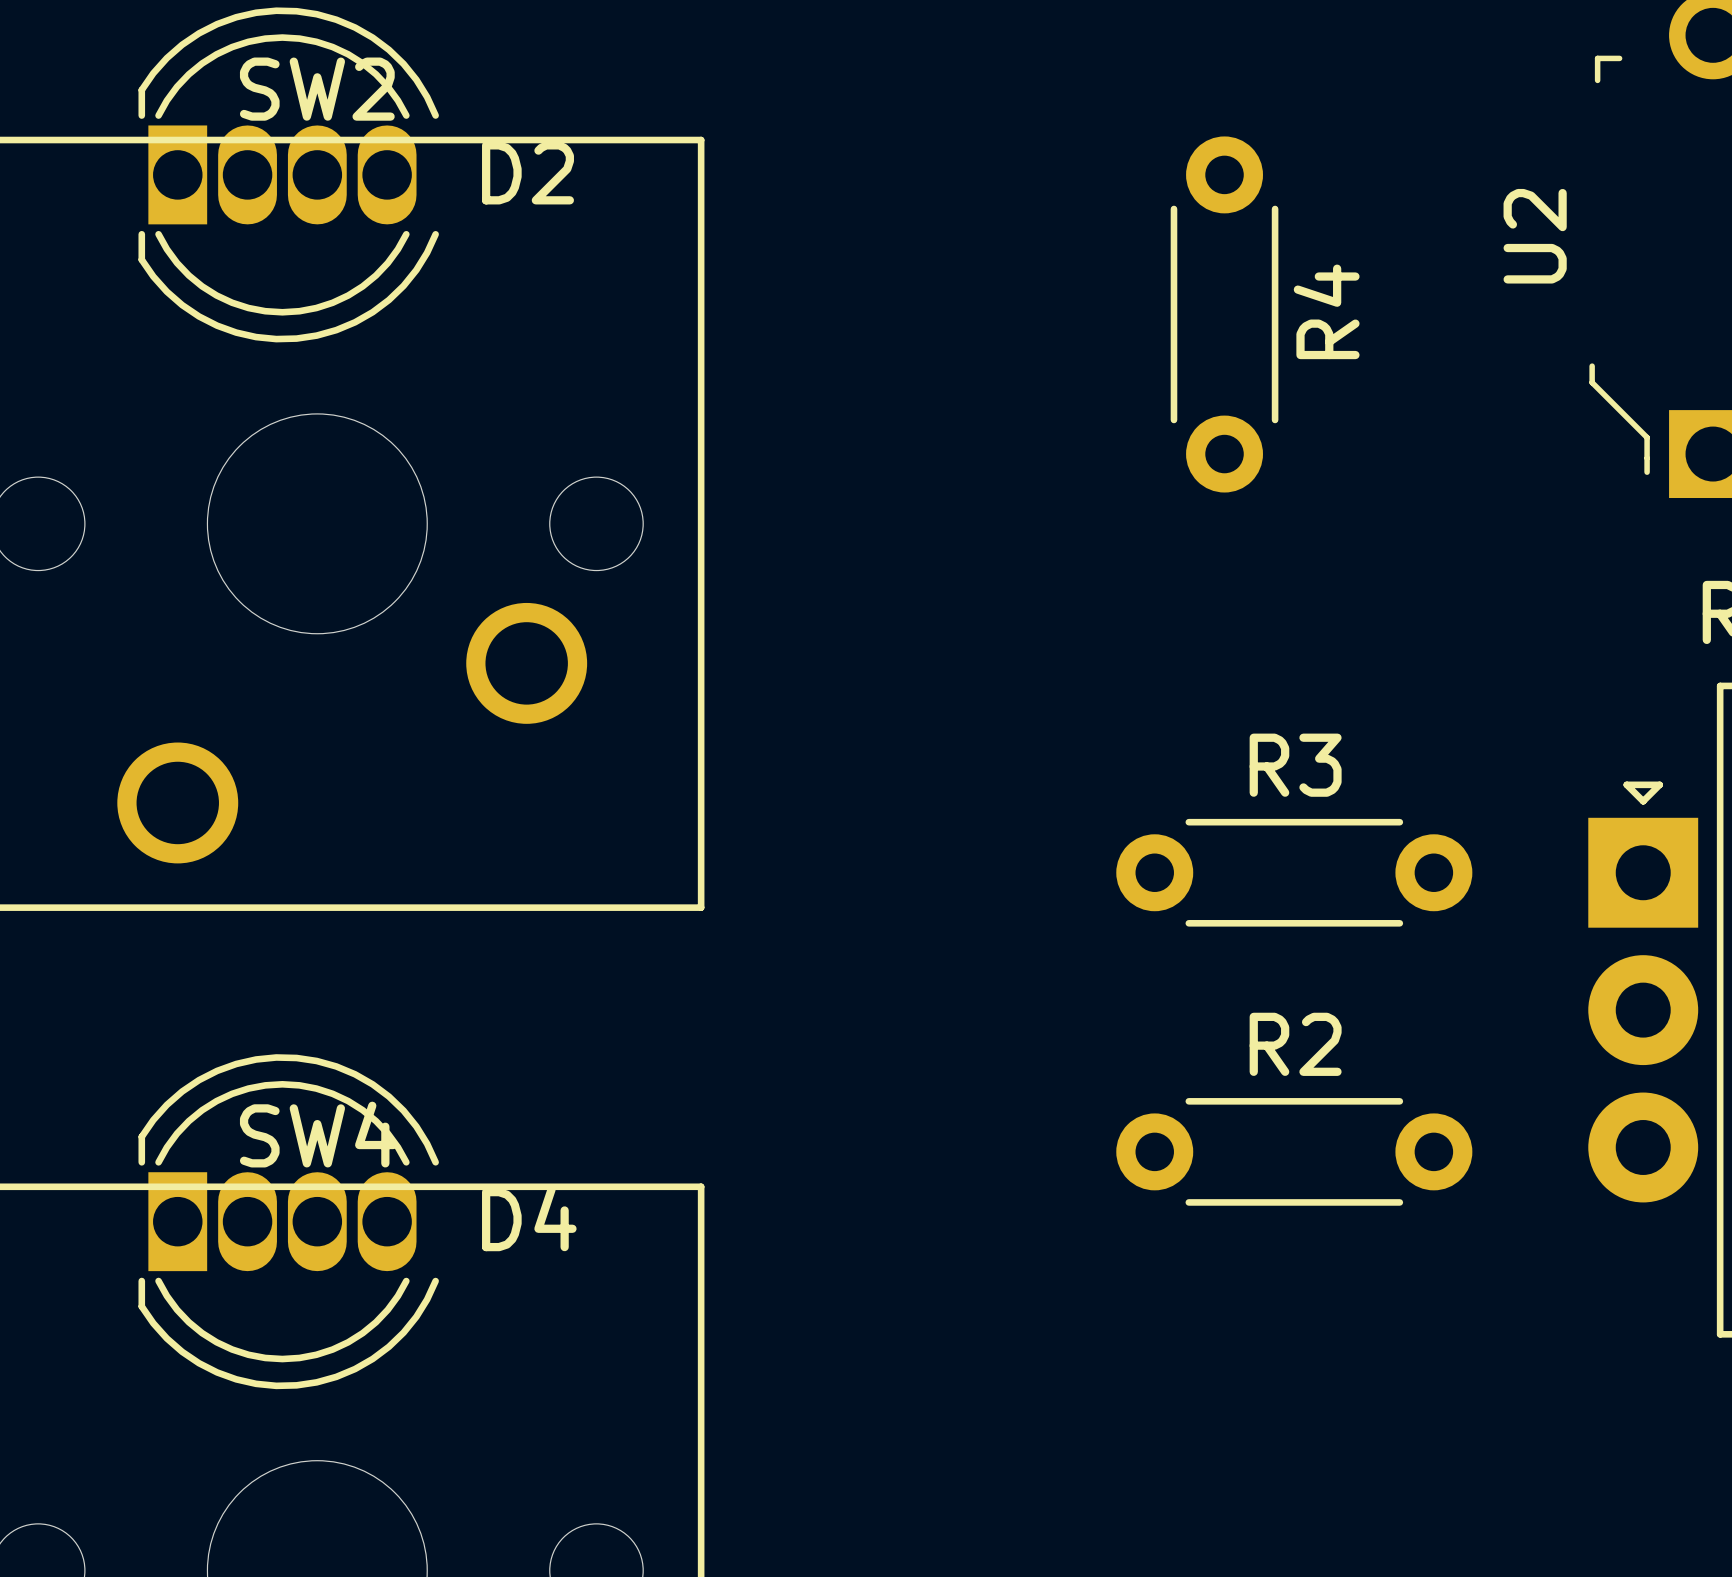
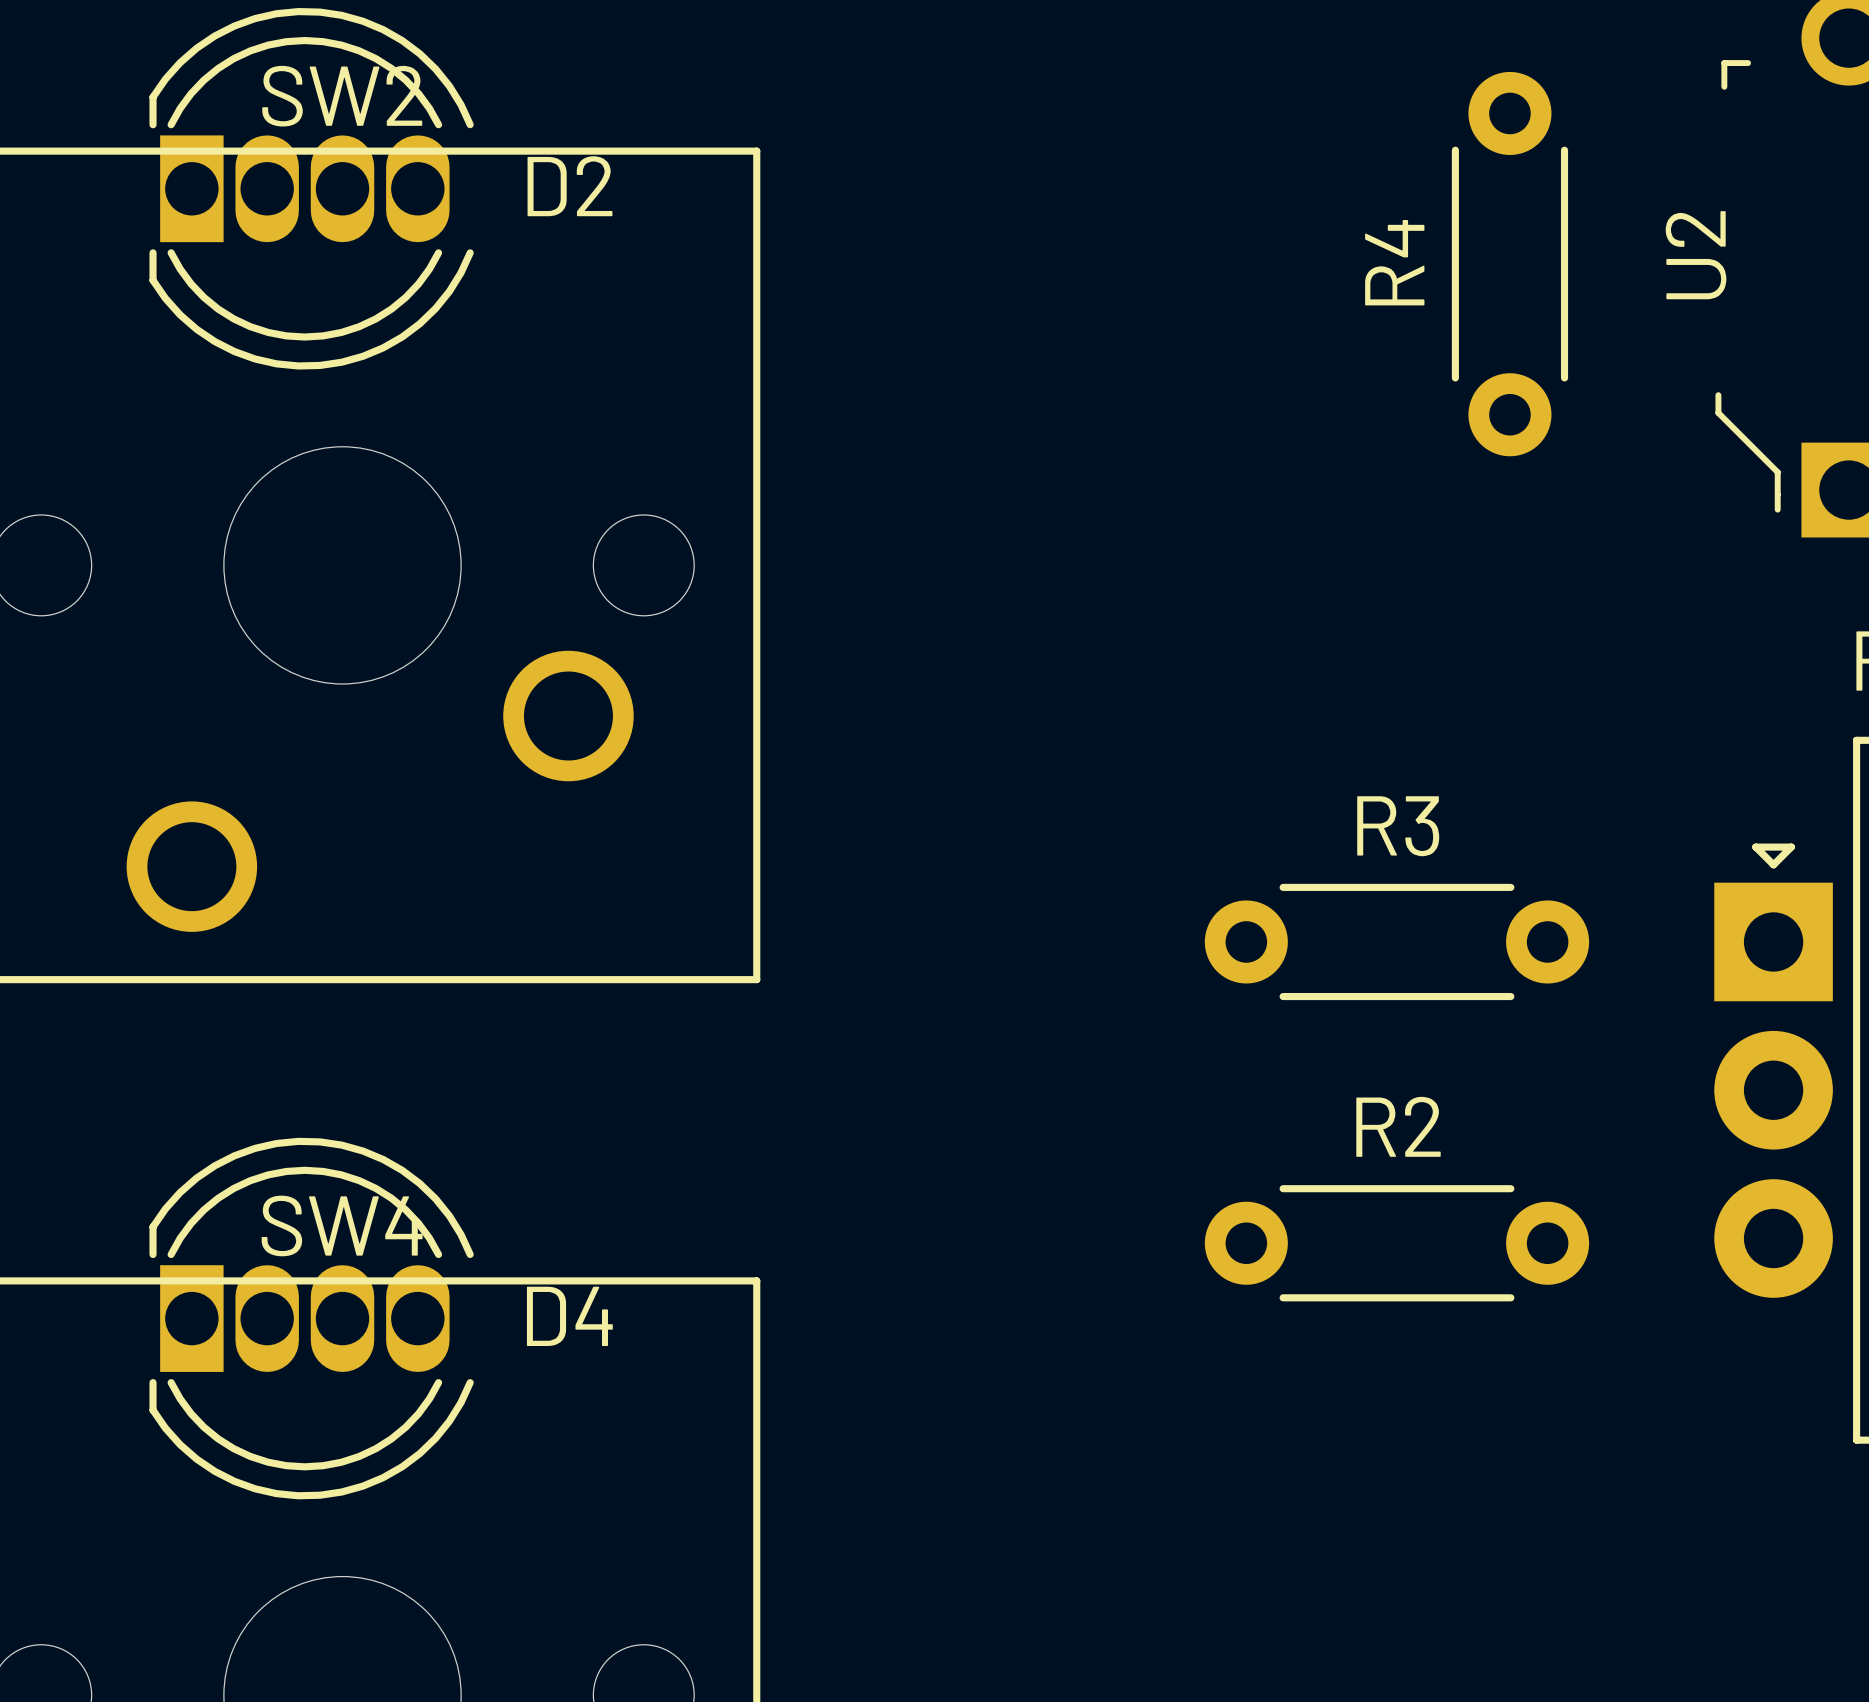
U2 name position: U2 (1535, 236) -> U2 (1696, 255)
R4 name position: R4 (1326, 311) -> R4 (1394, 262)
R4 position: (1224, 314) -> (1509, 264)

